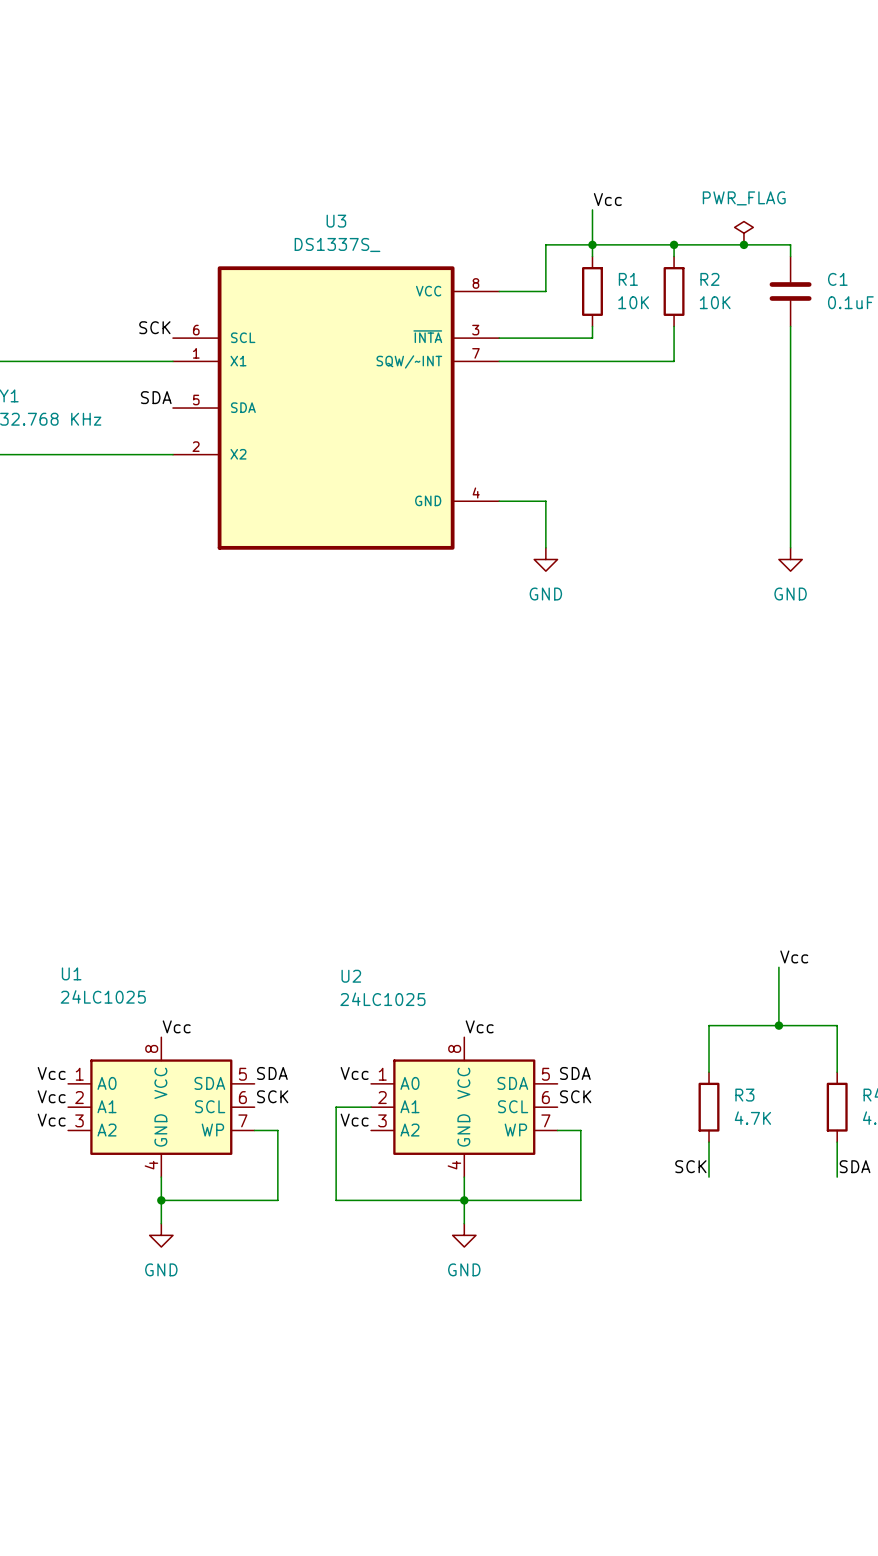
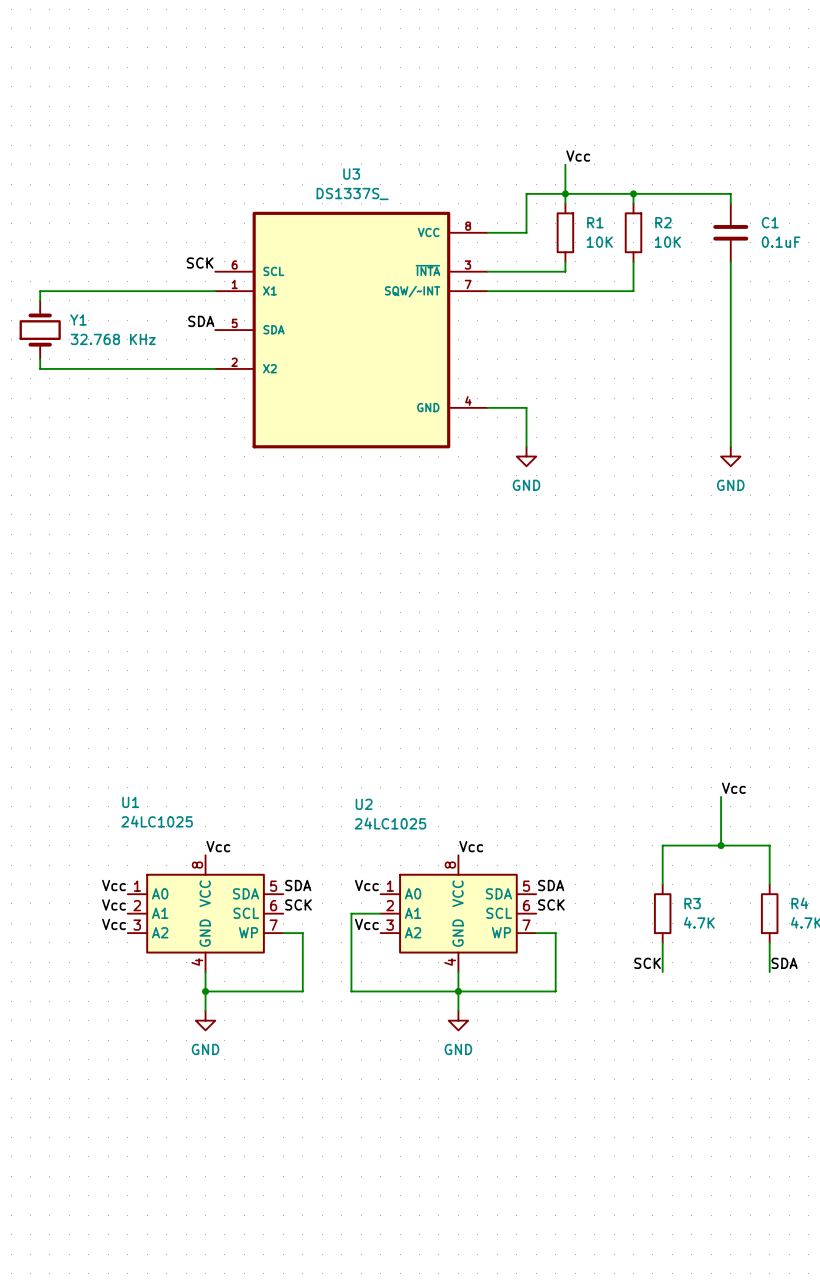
power symbol: PWR_FLAG (743, 233) -> none
junction: (743, 244) -> none

